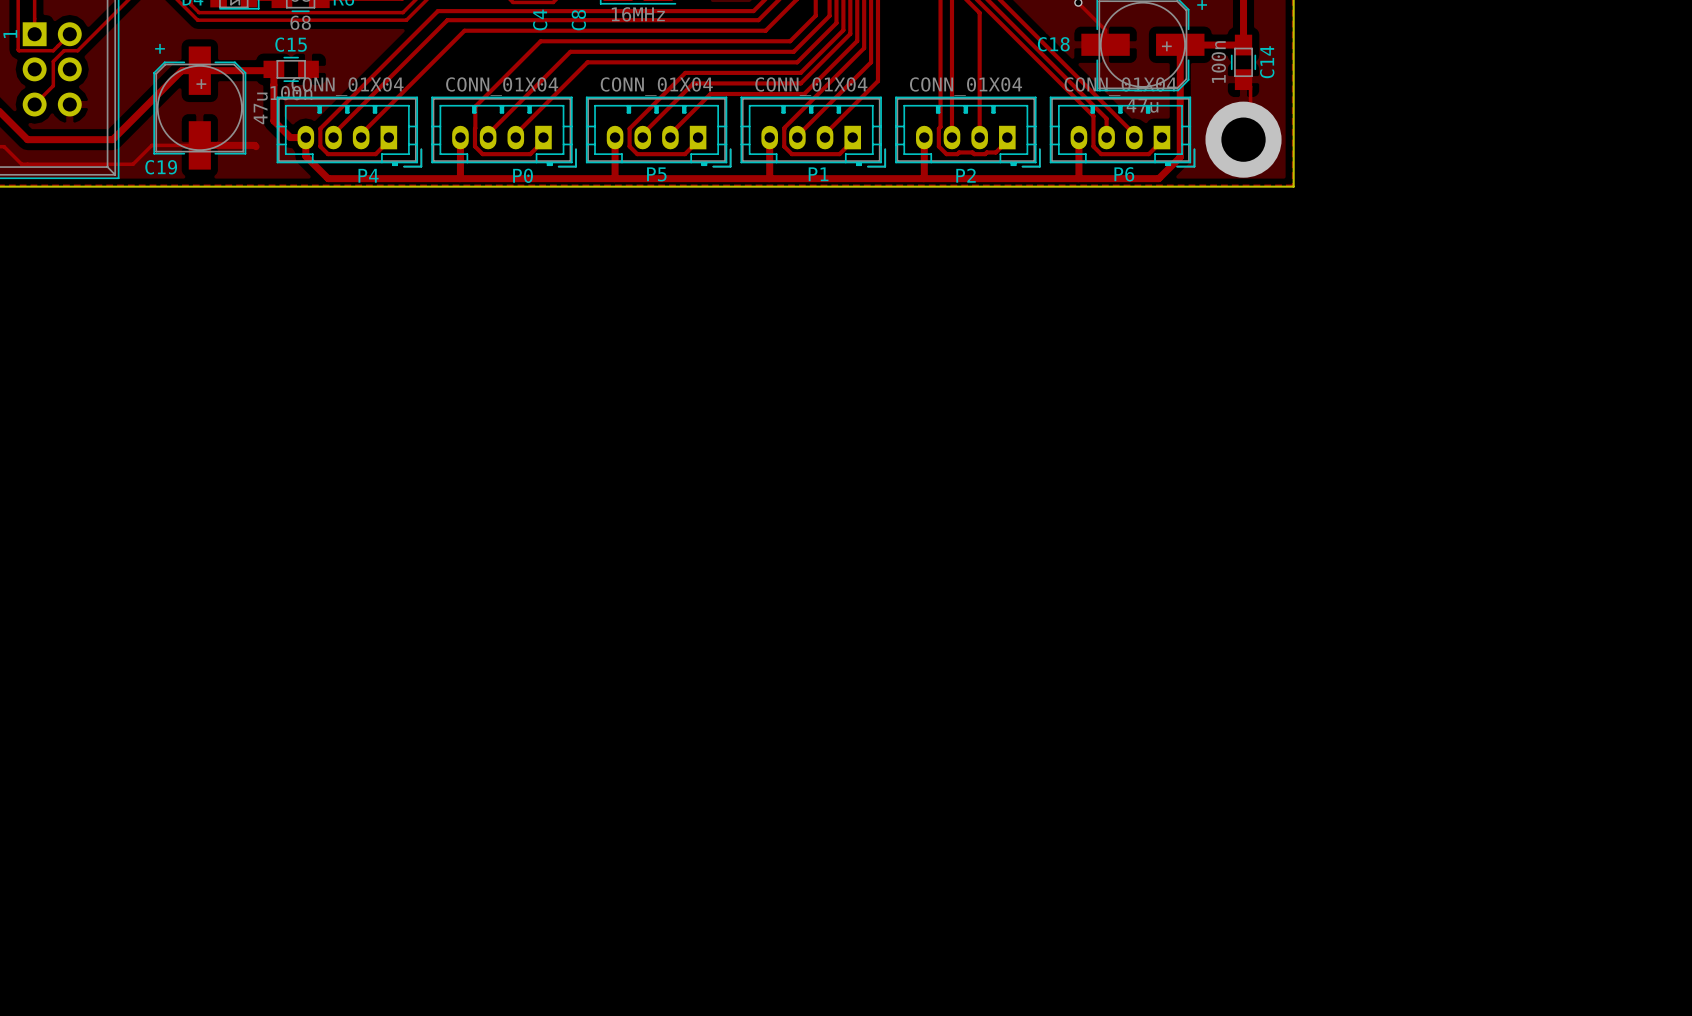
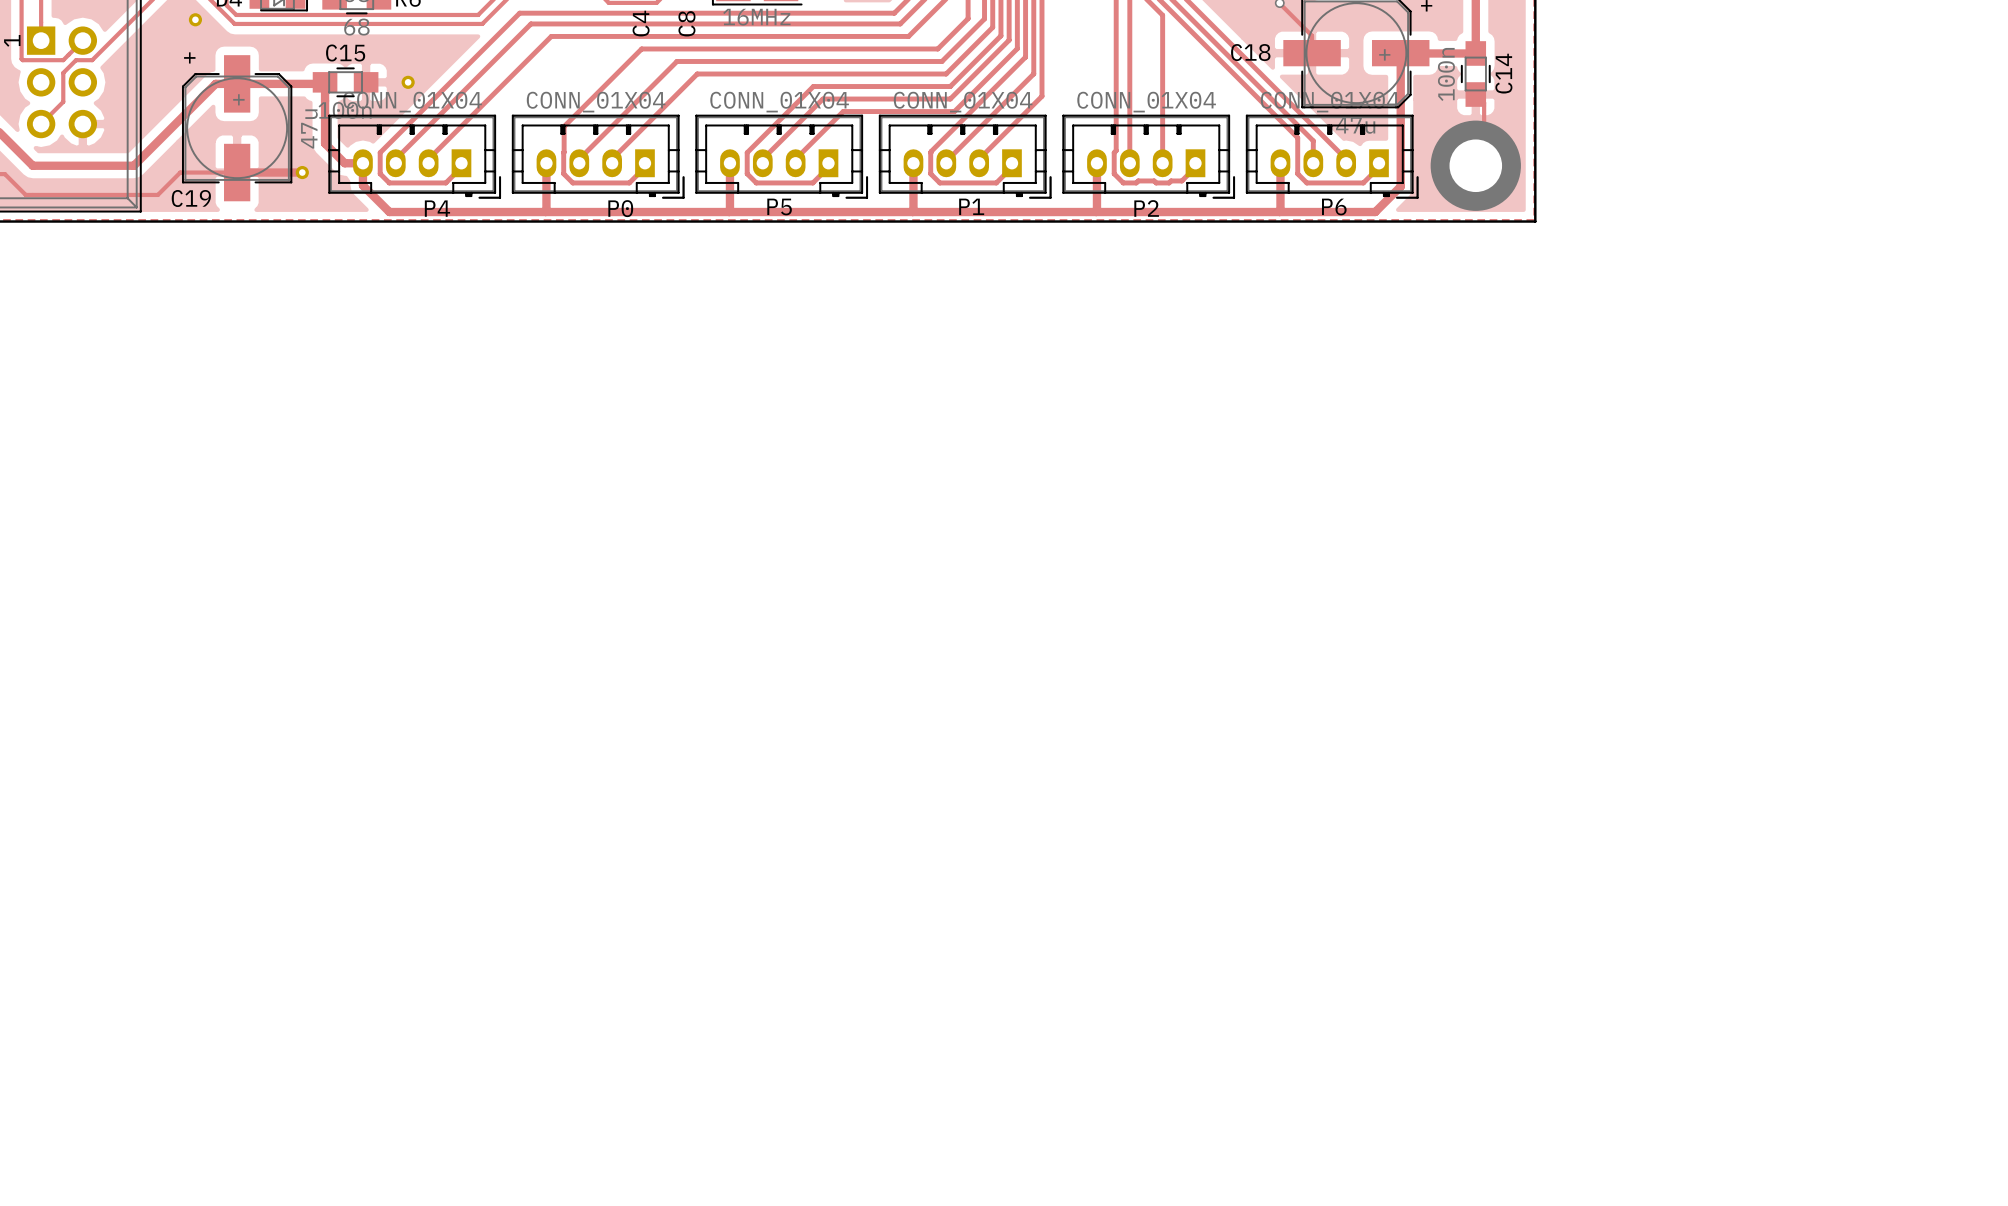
part: none -> (195, 19)
part: none -> (408, 82)
part: none -> (302, 172)

